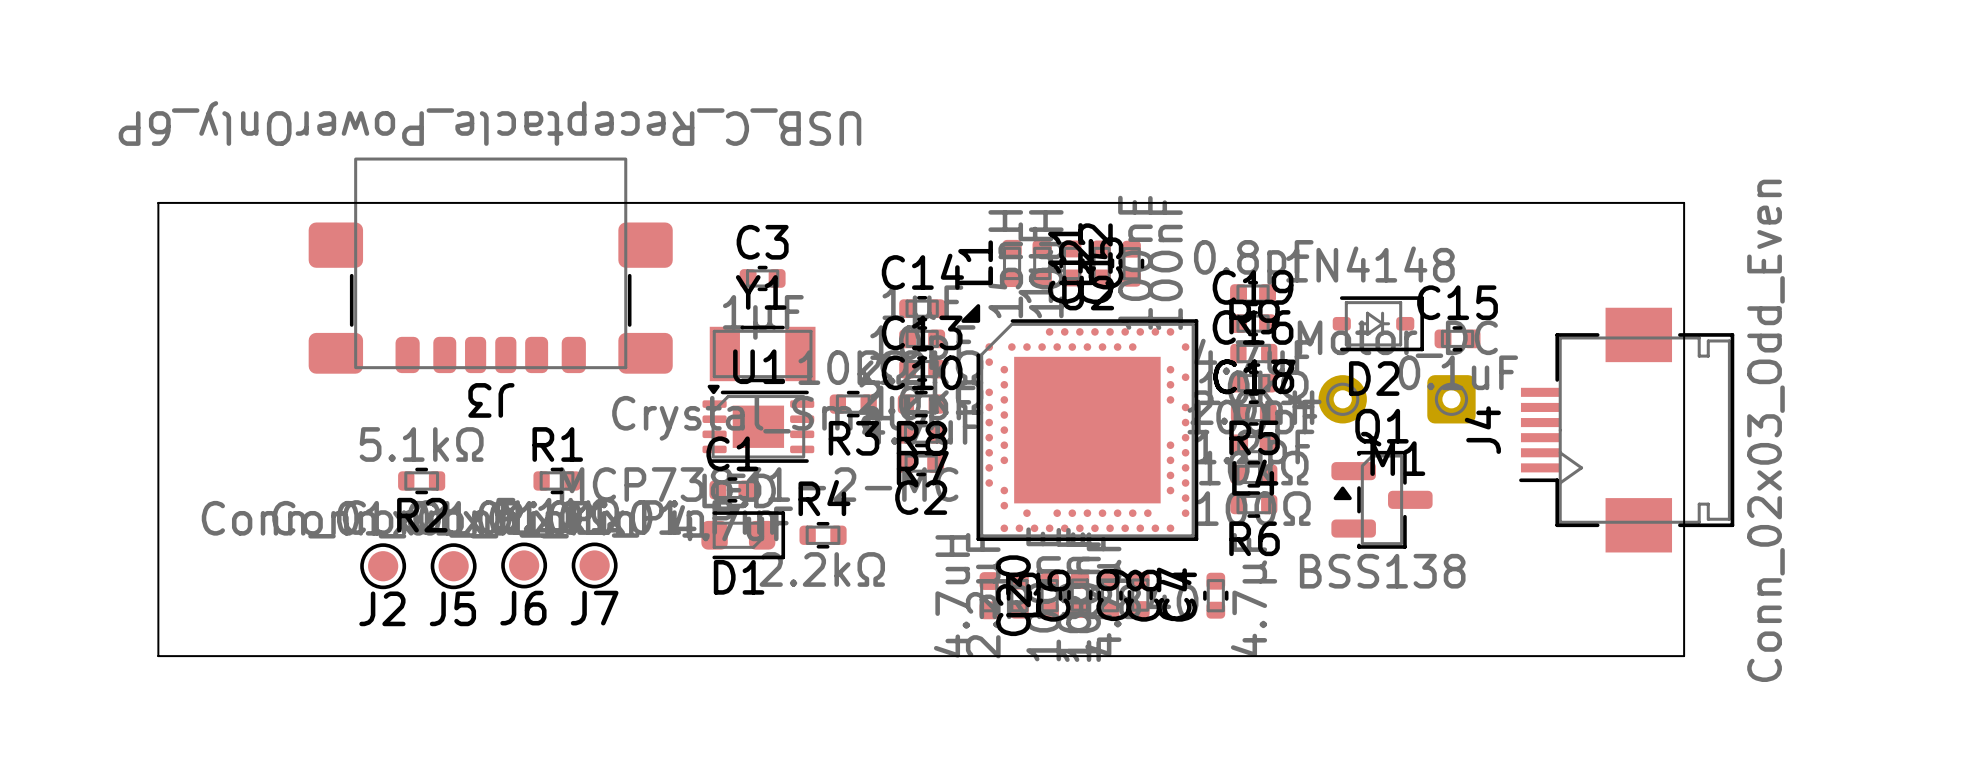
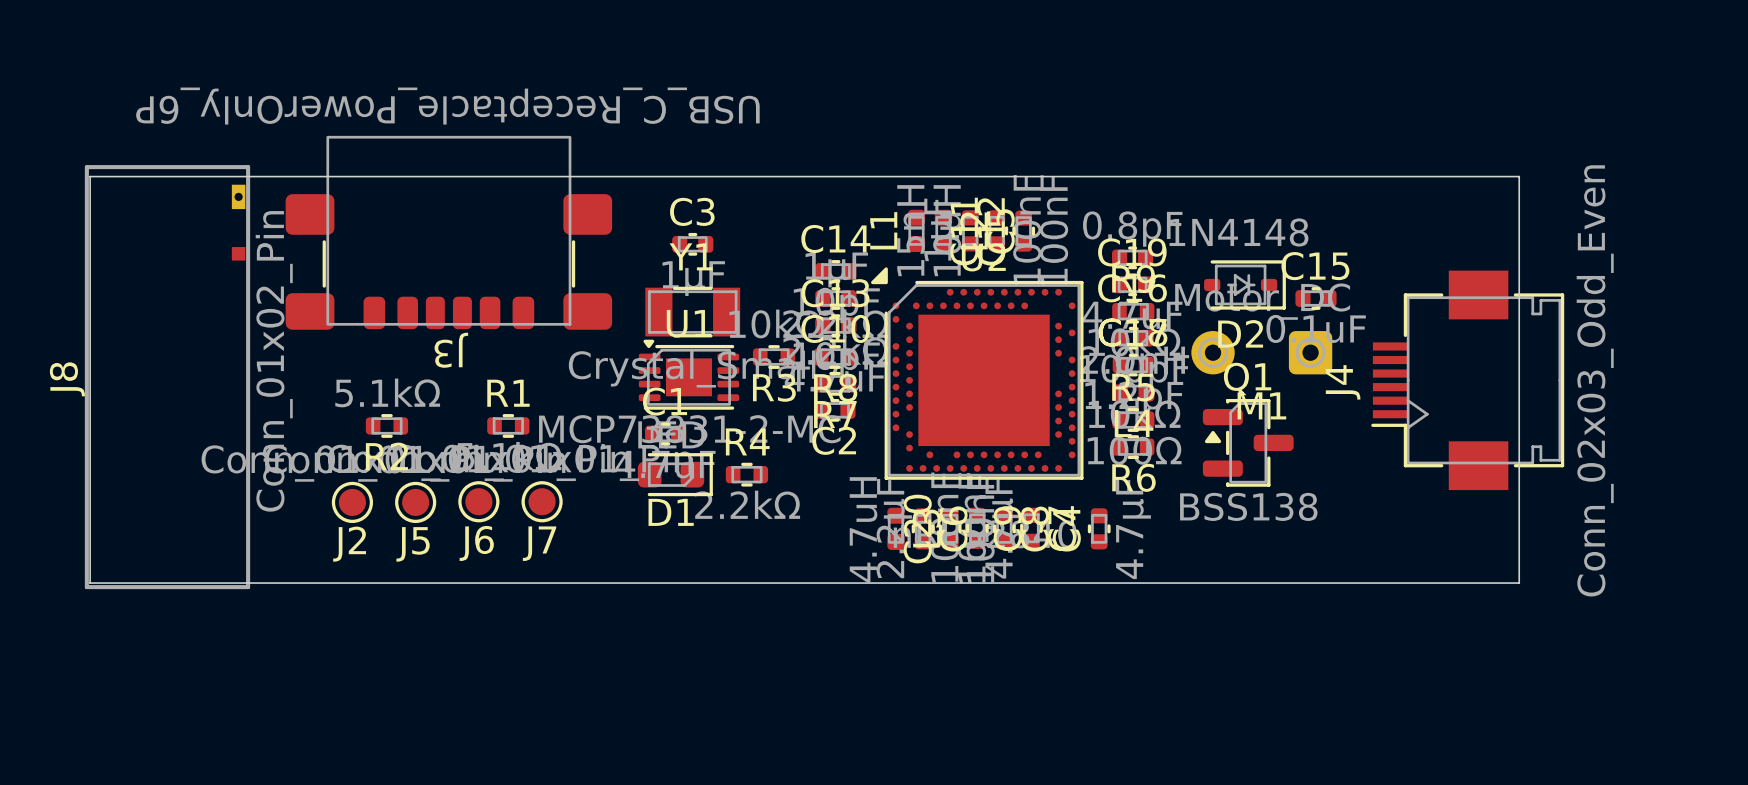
board edge: (158, 202) (158, 656) -> (150, 176) (90, 176) (90, 583) (150, 583)
J8: none -> Conn_01x02_Pin (167, 377)

